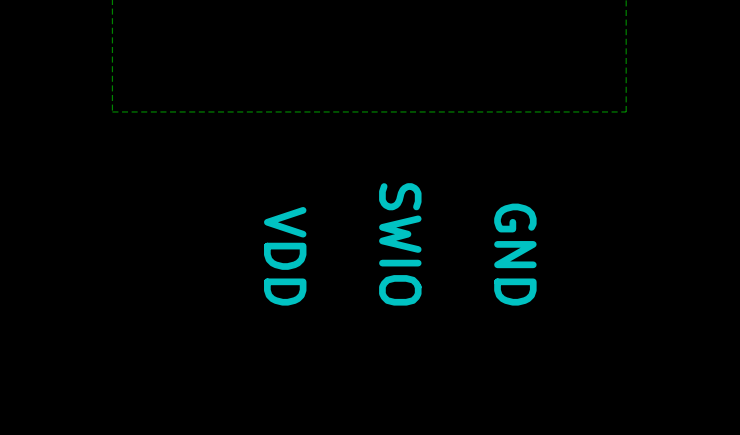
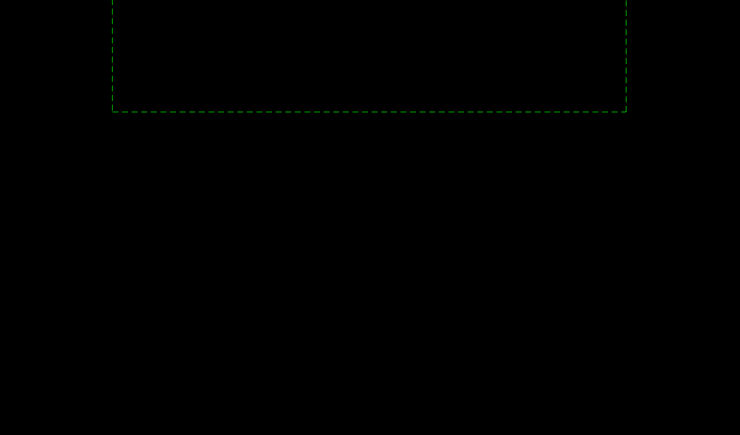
text: SWIO (400, 244) -> none
text: GND (515, 254) -> none
text: VDD (285, 256) -> none

